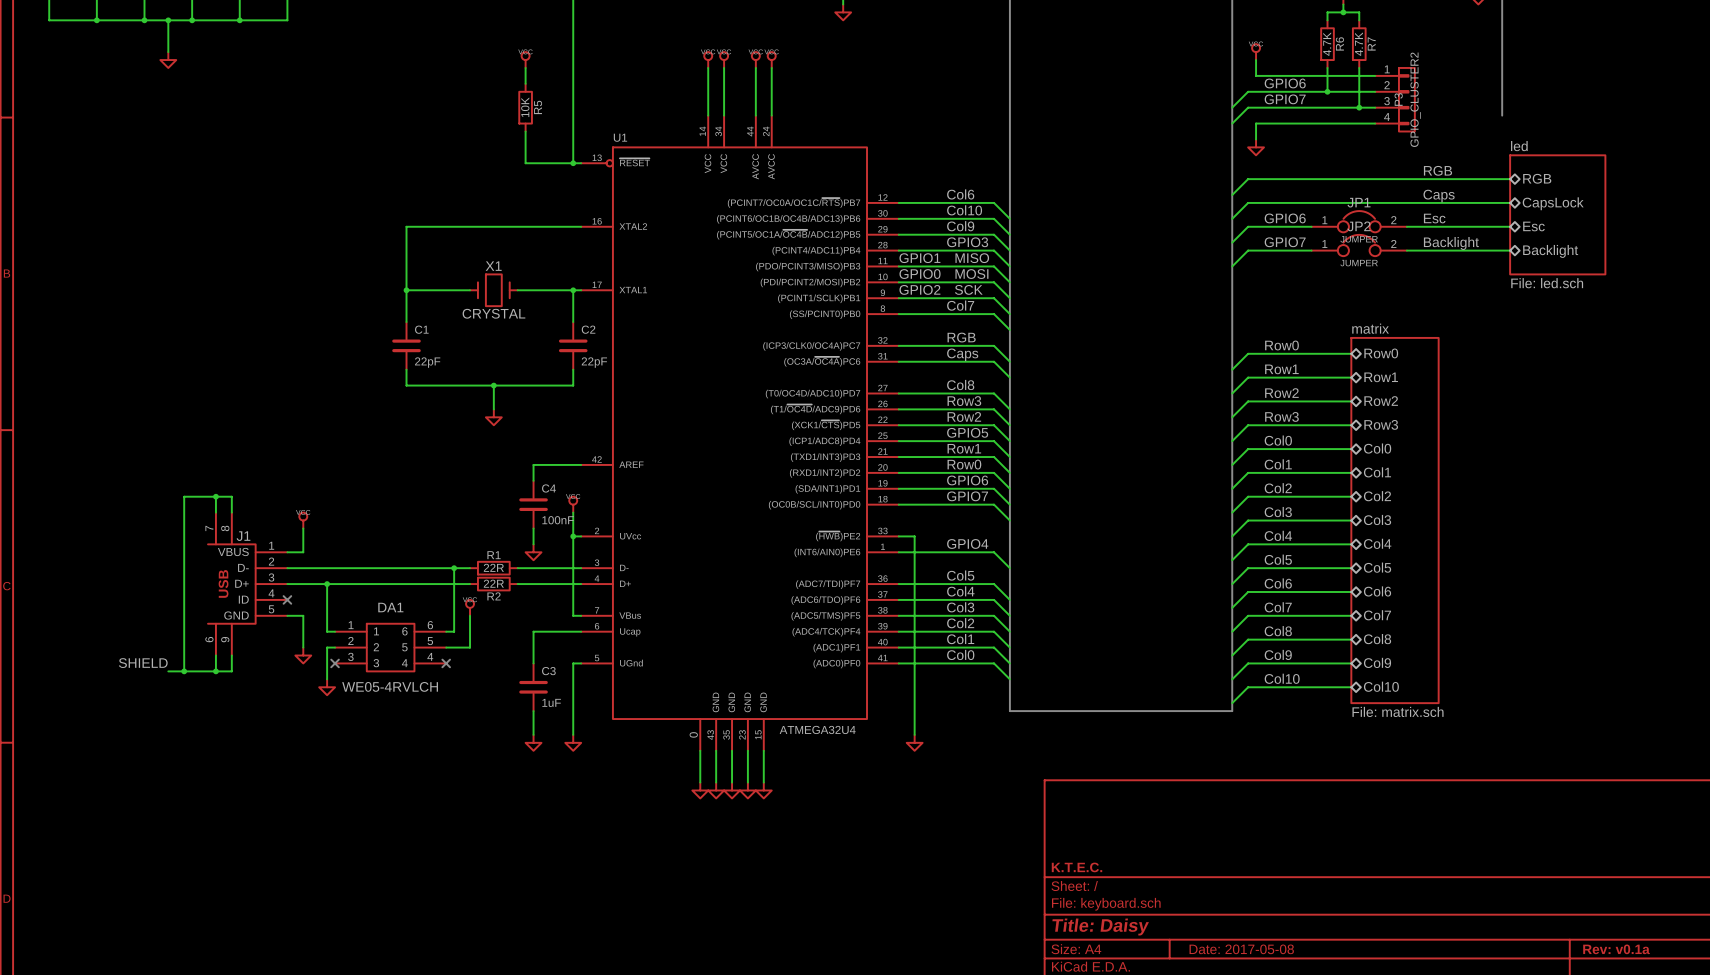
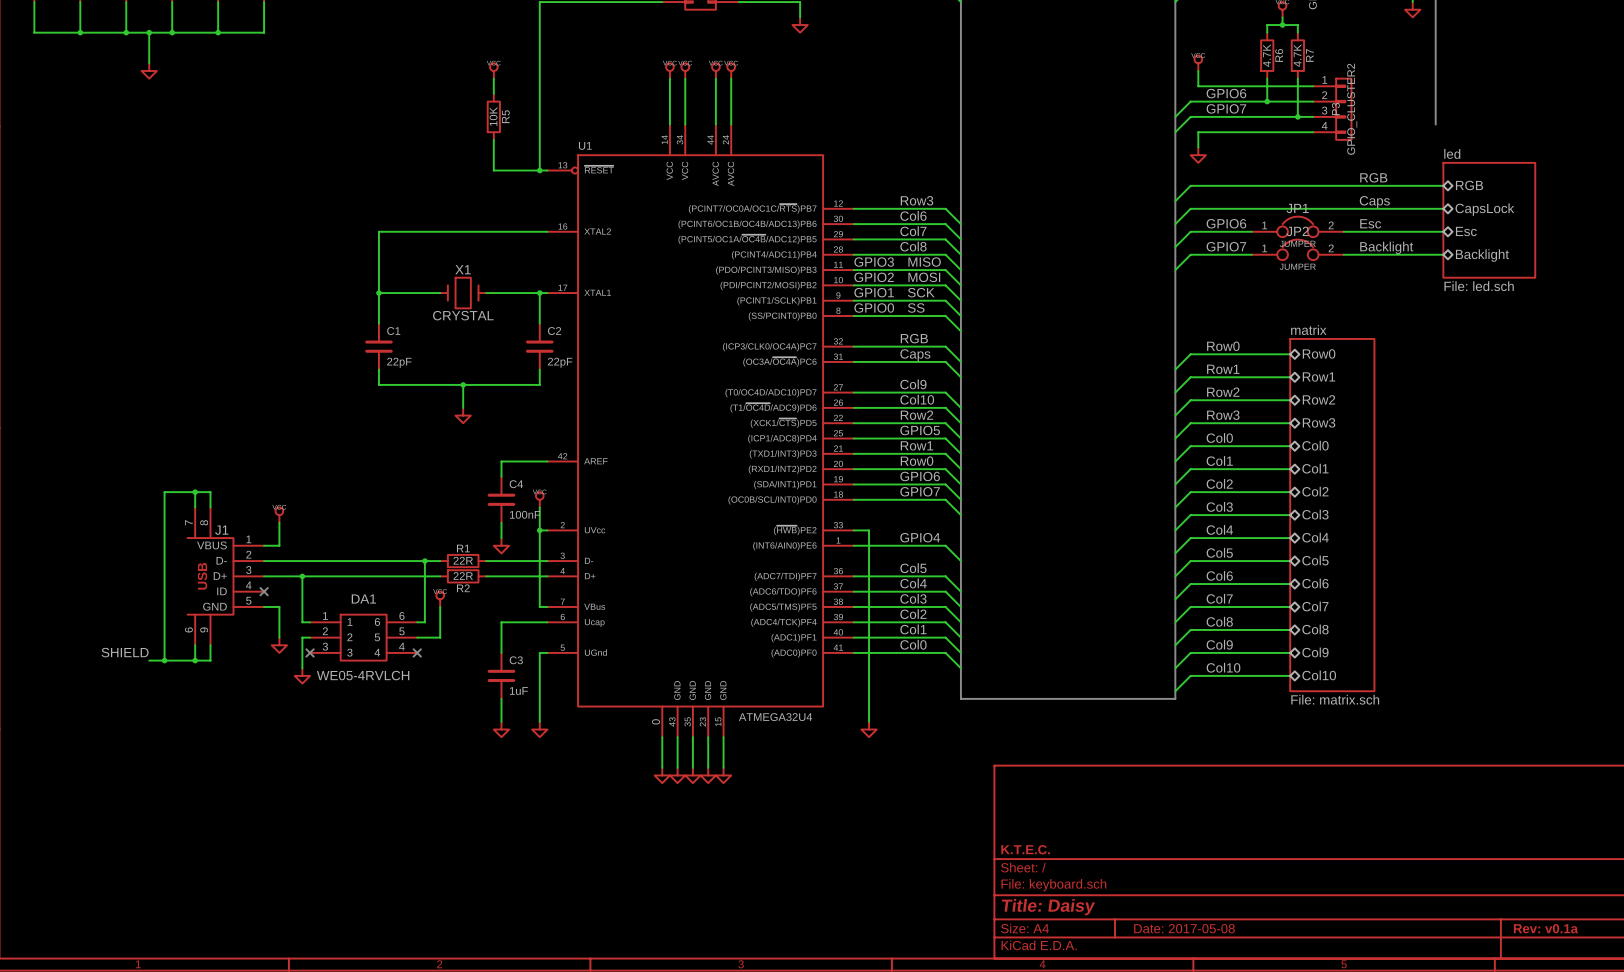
label: Col6 (960, 194) -> Row3 (917, 200)
label: Col10 (964, 210) -> Col6 (913, 215)
label: Col9 (960, 226) -> Col7 (913, 231)
label: GPIO3 (967, 242) -> Col8 (913, 246)
label: GPIO1 (919, 258) -> GPIO3 (874, 262)
label: GPIO0 (920, 274) -> GPIO2 (874, 277)
label: GPIO2 (919, 289) -> GPIO1 (874, 292)
label: none -> GPIO0 (874, 307)
label: Col7 (960, 305) -> none
label: none -> SS (916, 307)
label: Col8 (960, 385) -> Col9 (913, 384)
label: Row3 (964, 401) -> Col10 (917, 399)

